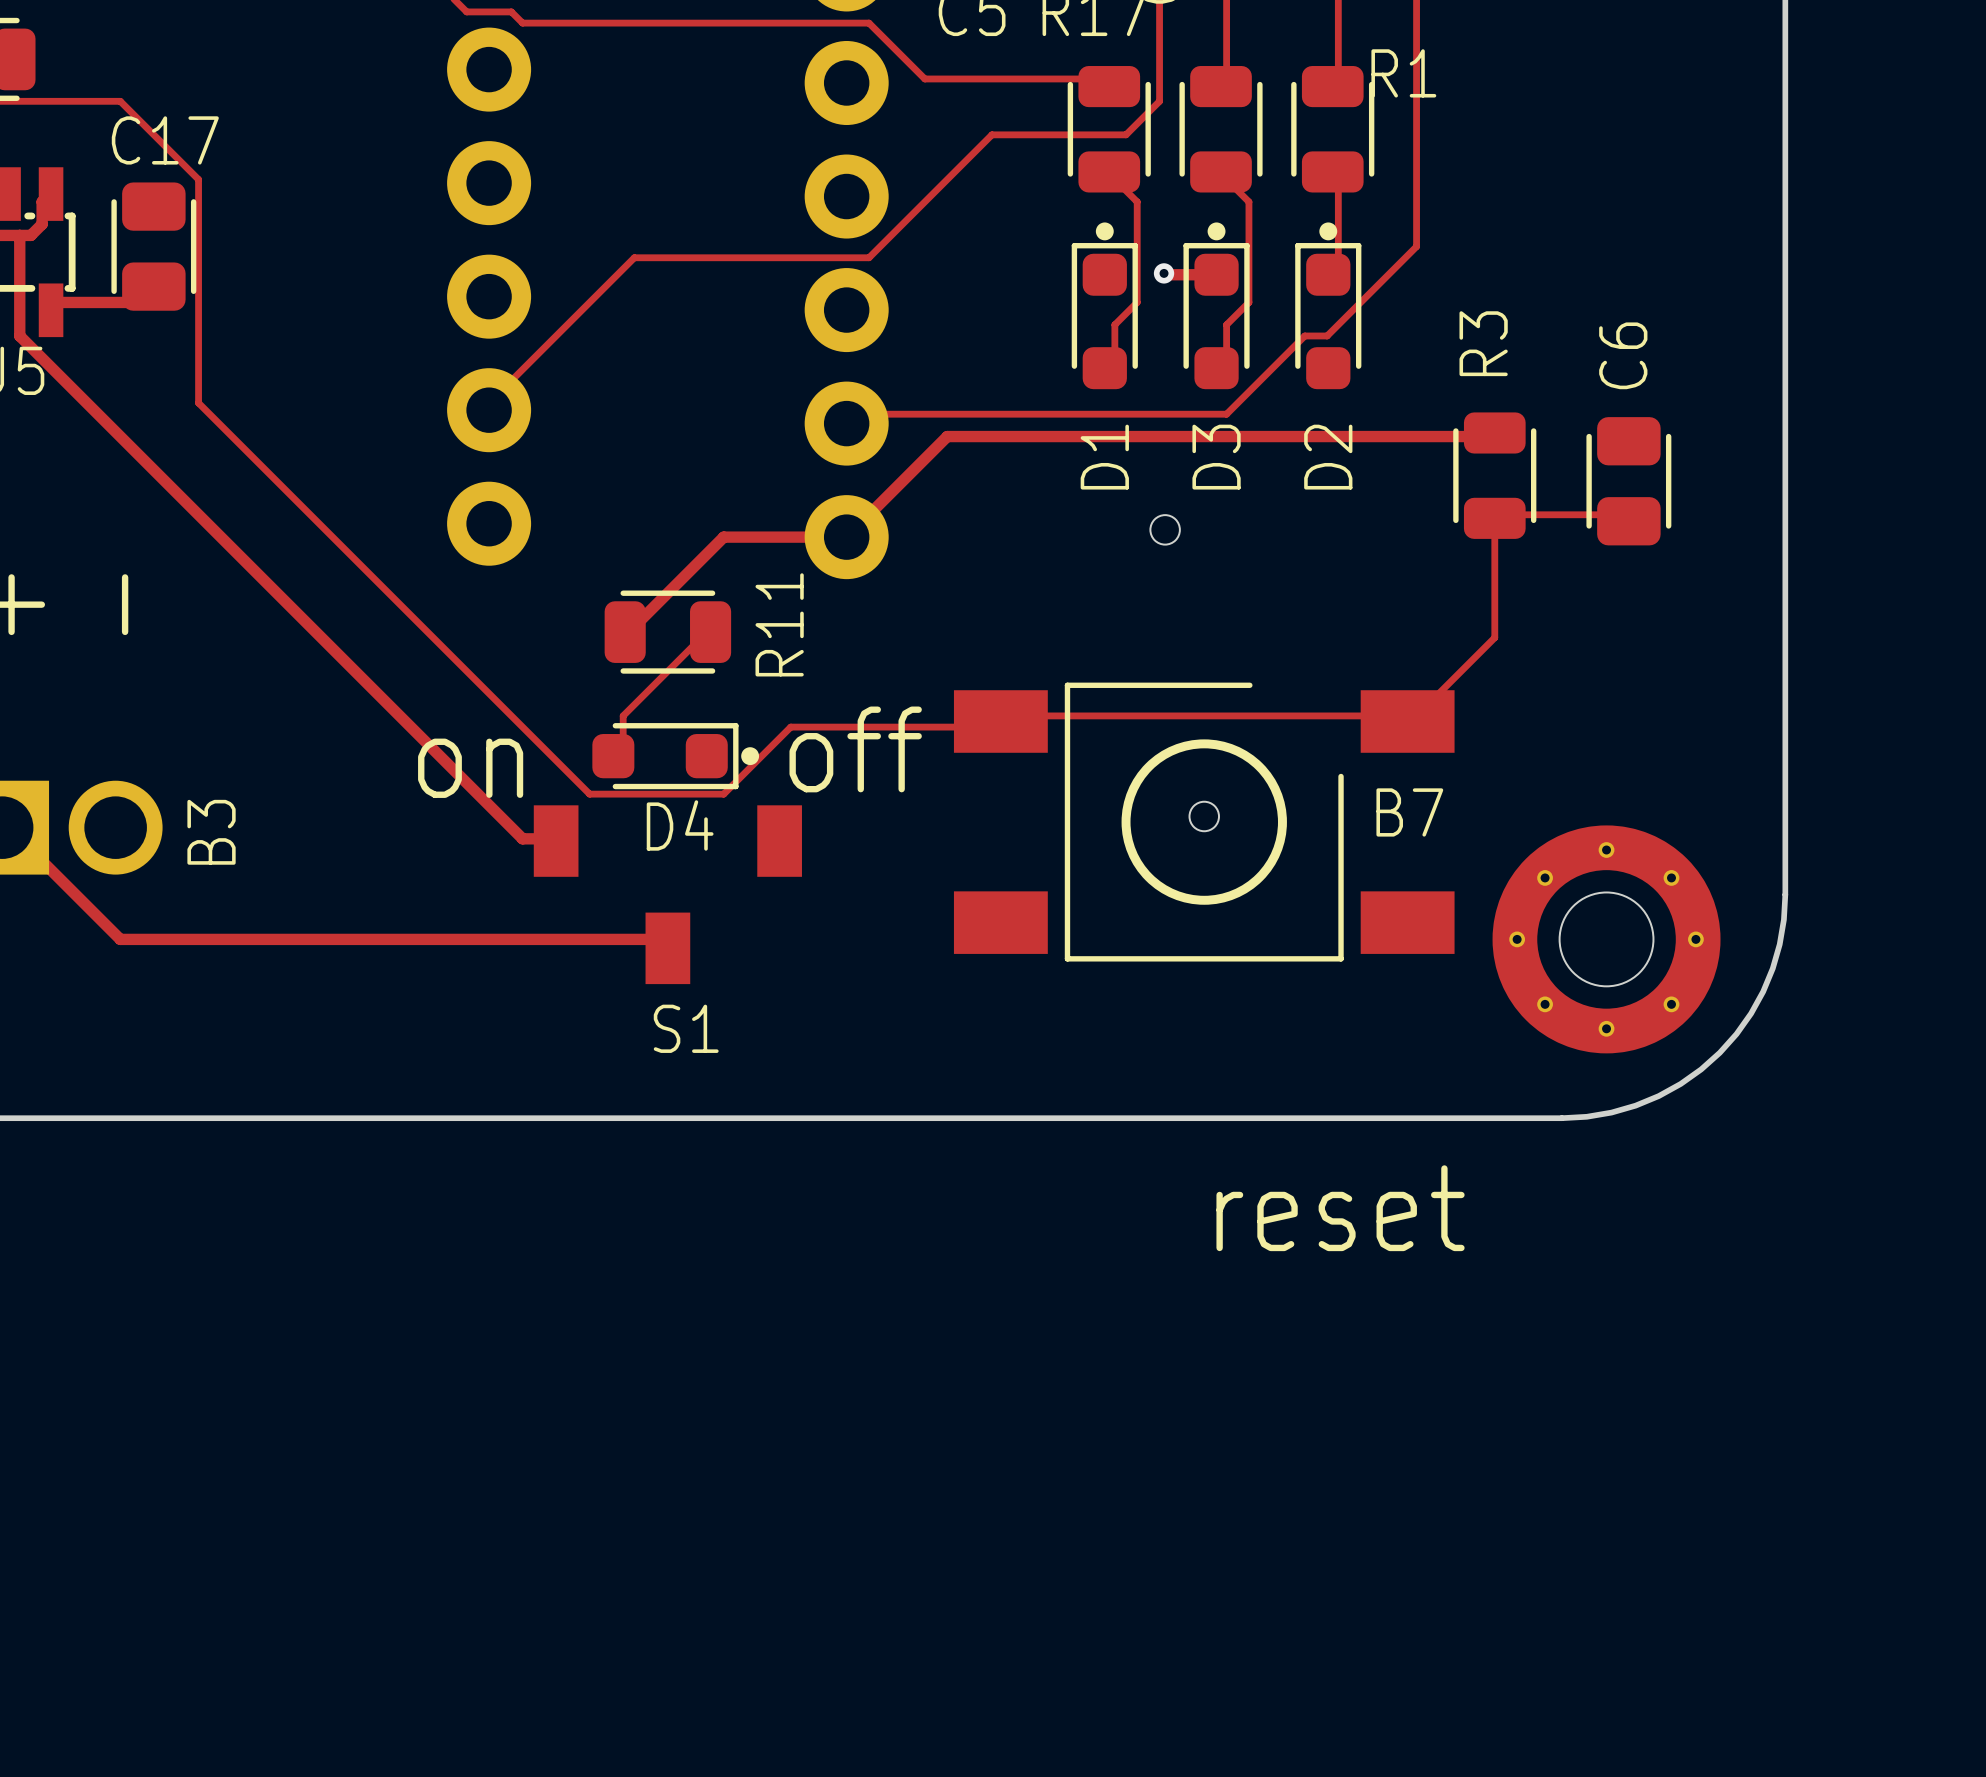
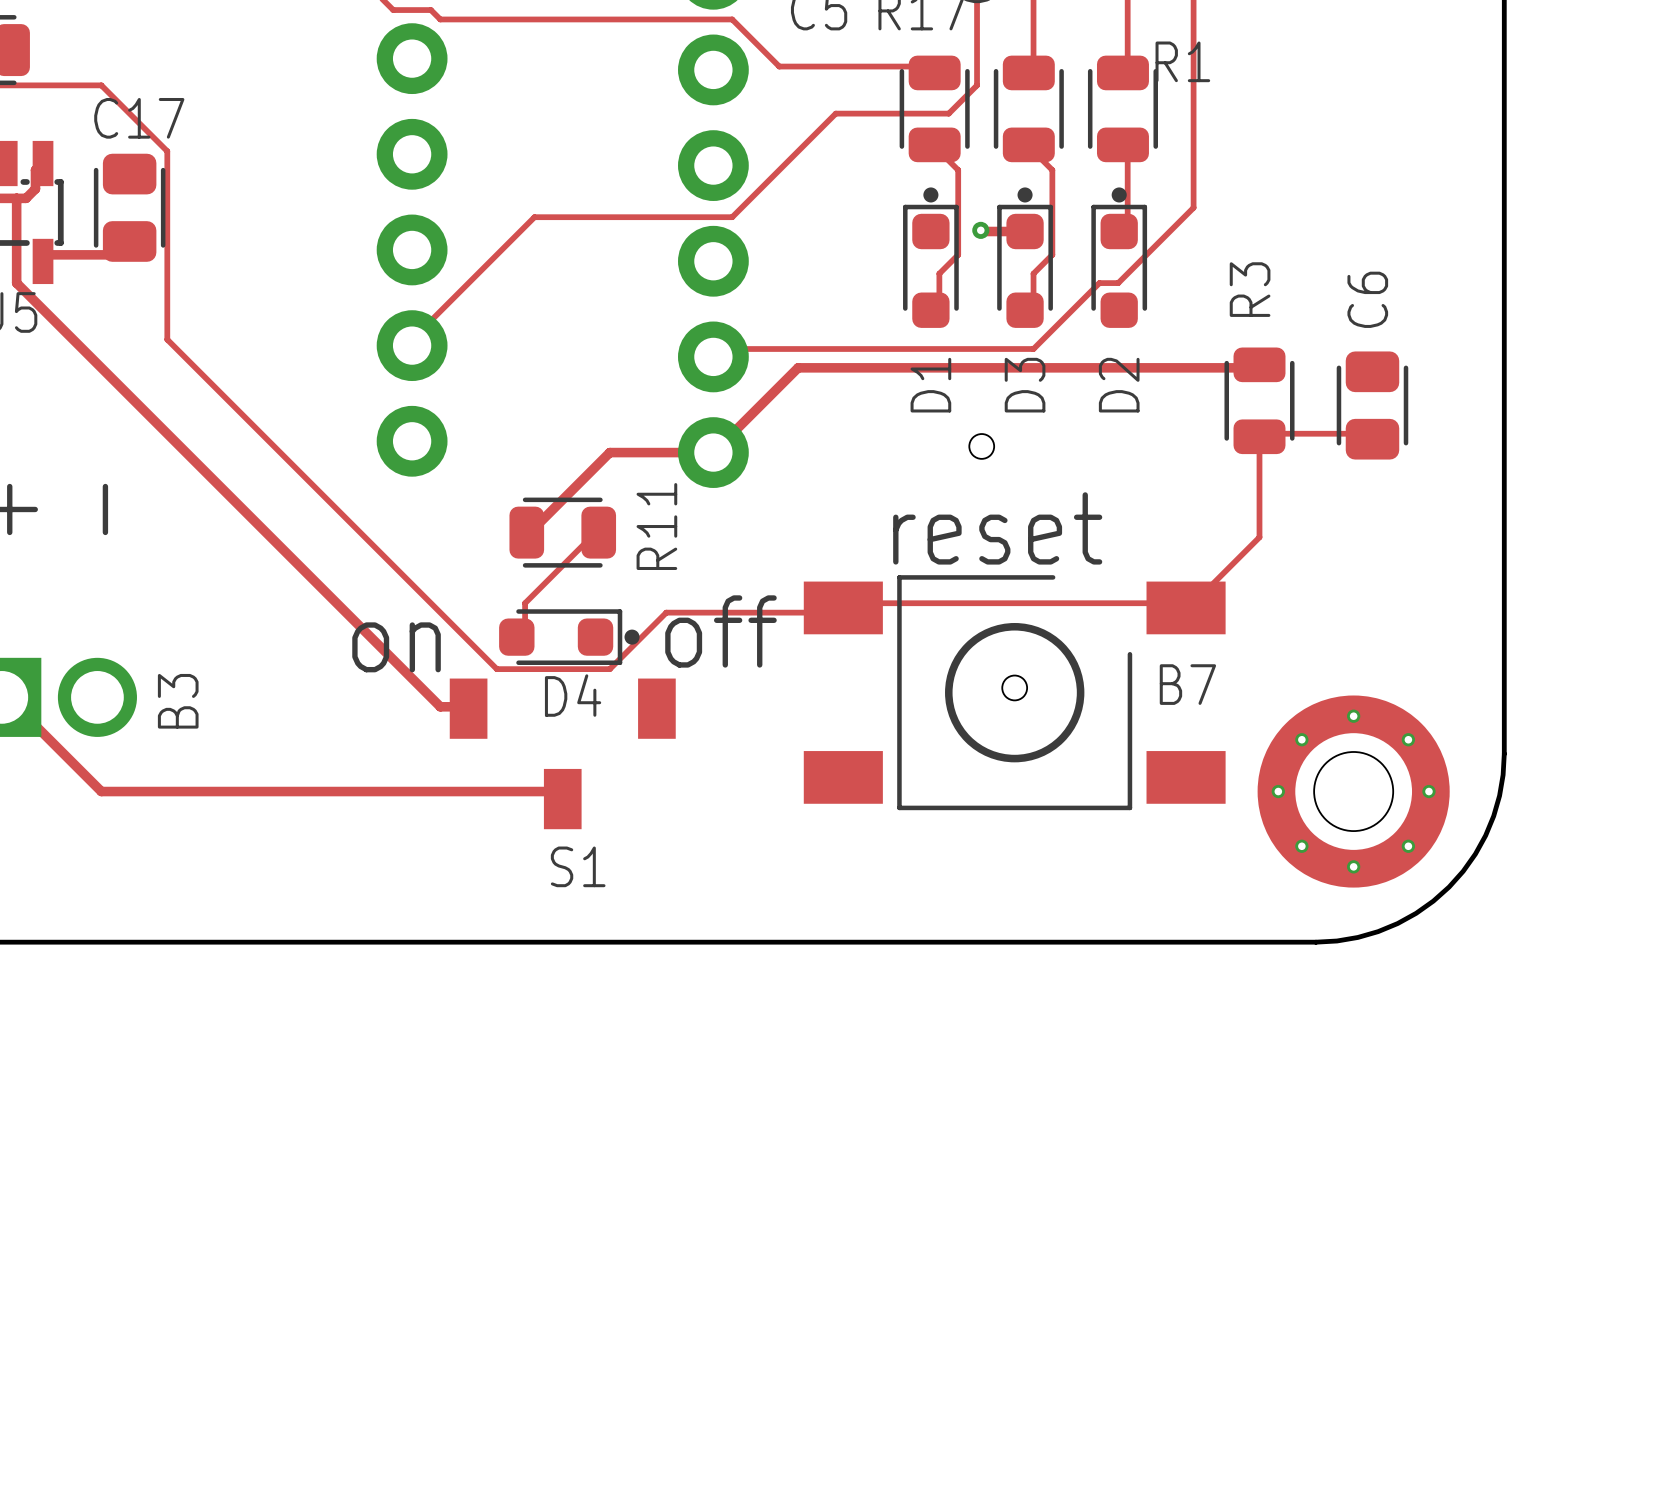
text position: reset (1340, 1208) -> reset (997, 528)

